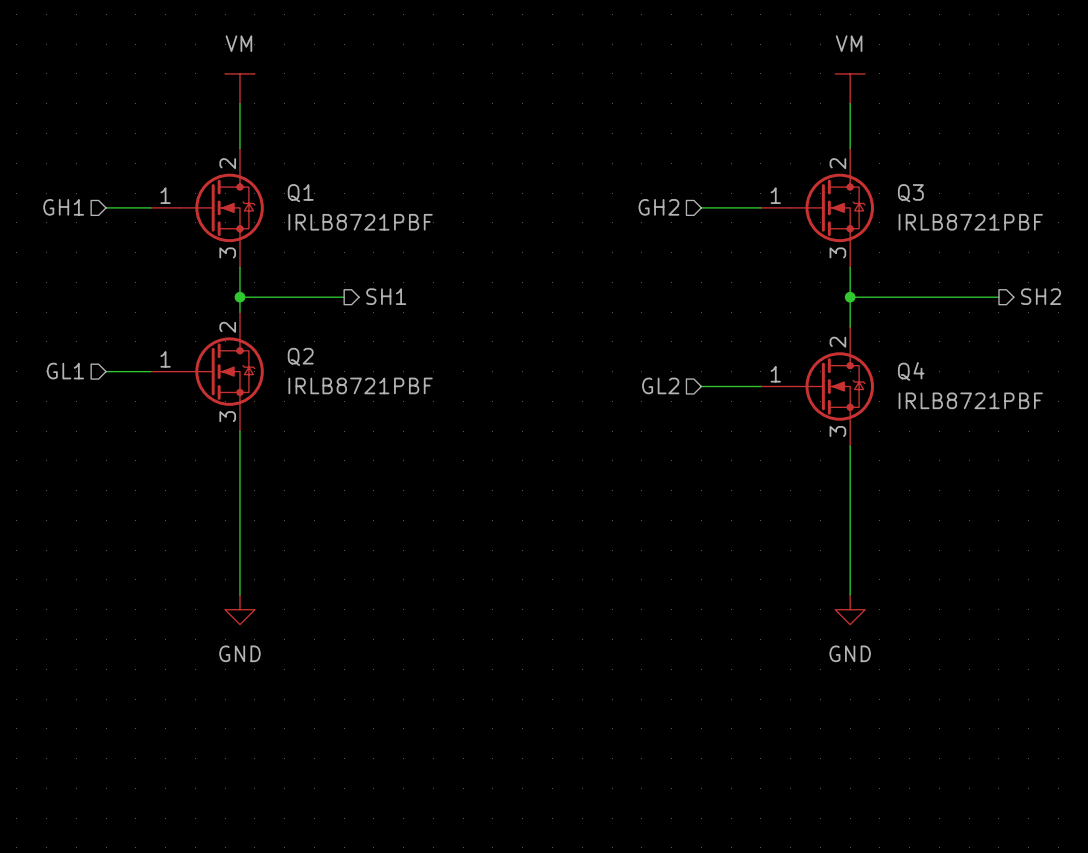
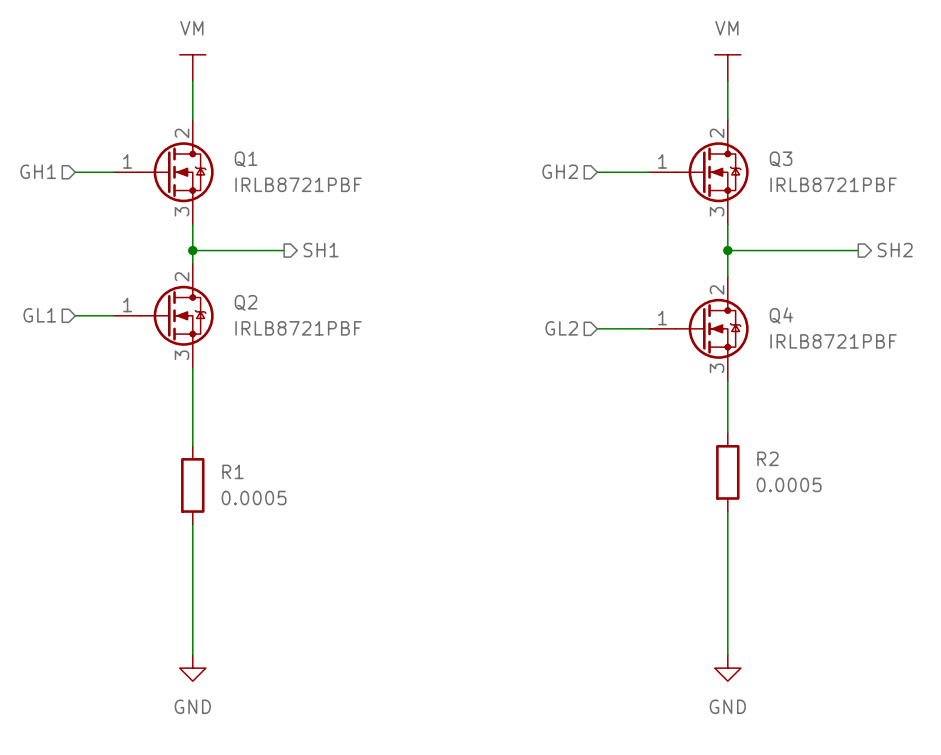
wire: (850, 505) (850, 594) -> (727, 655) (727, 511)
wire: (239, 520) (239, 594) -> none
R2: none -> 0.0005 (727, 472)
R1: none -> 0.0005 (192, 485)
wire: none -> (192, 524) (192, 655)
power symbol position: GND (239, 609) -> GND (192, 668)
power symbol position: GND (850, 609) -> GND (727, 668)

